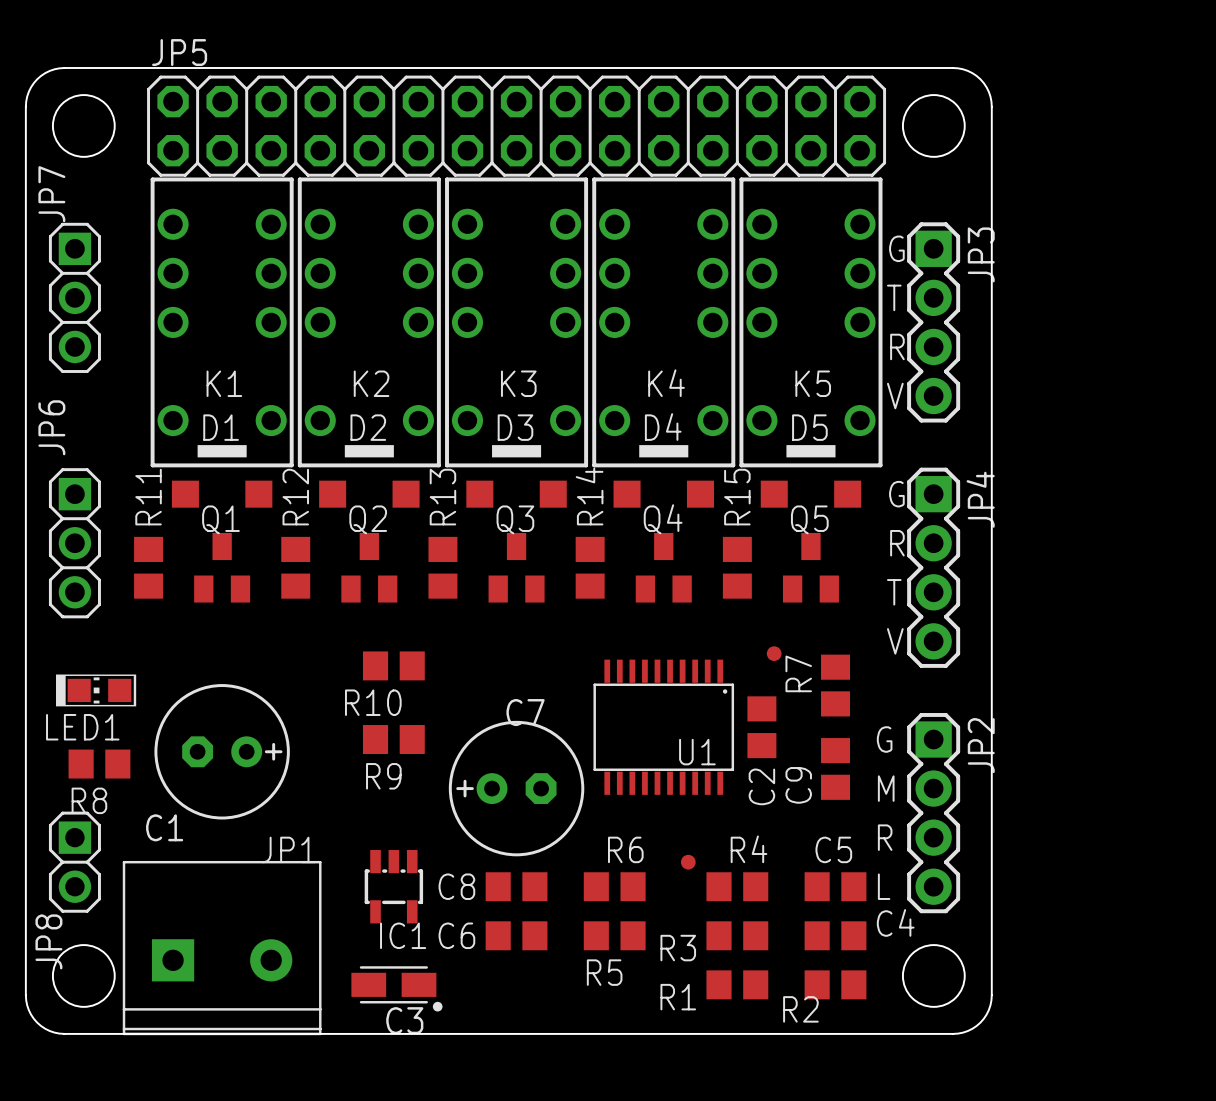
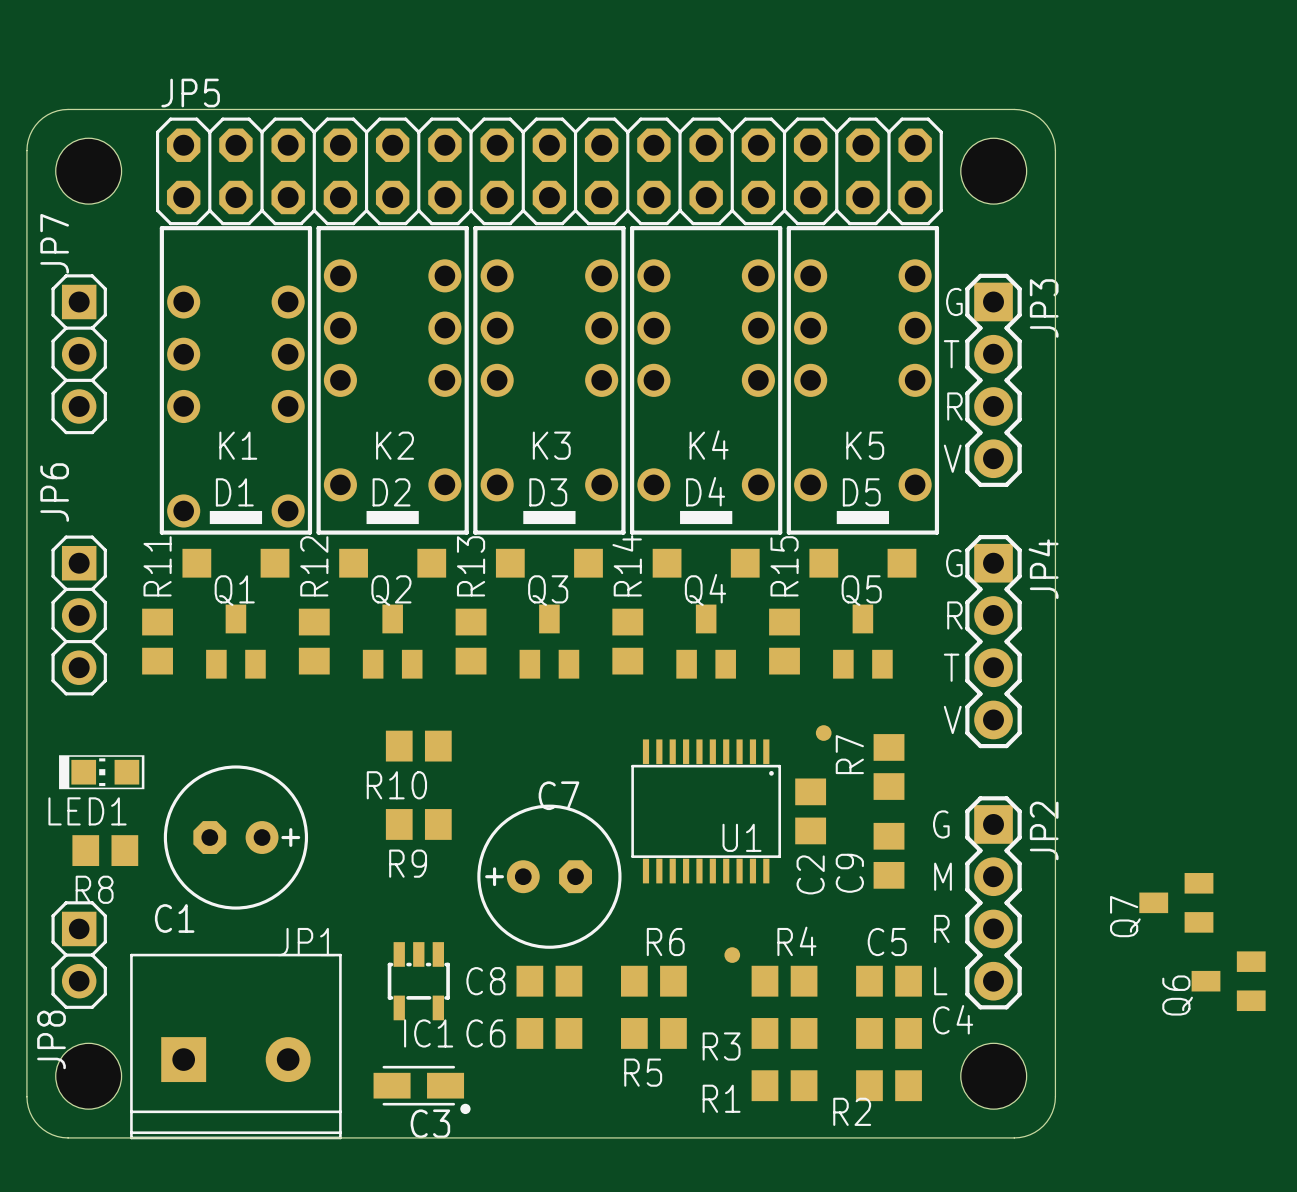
K1 footprint: [150, 177, 294, 468] -> [159, 226, 313, 535]
Q7: none -> (1176, 902)
Q6: none -> (1228, 981)

